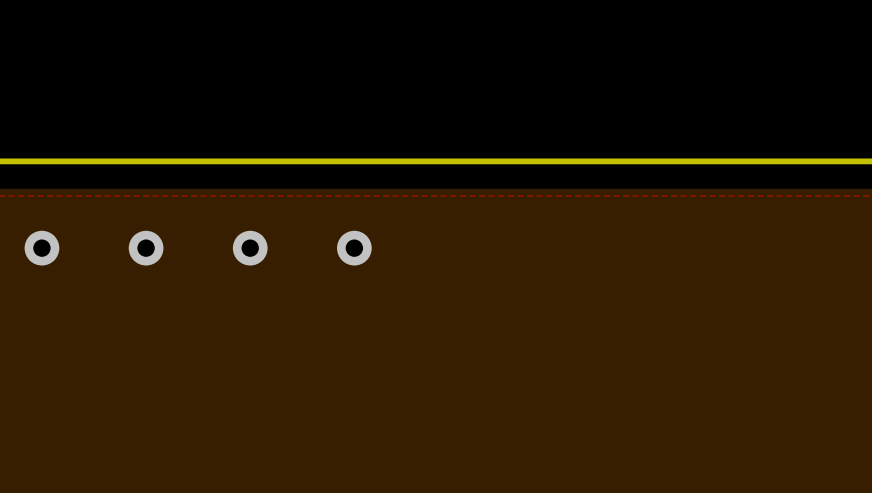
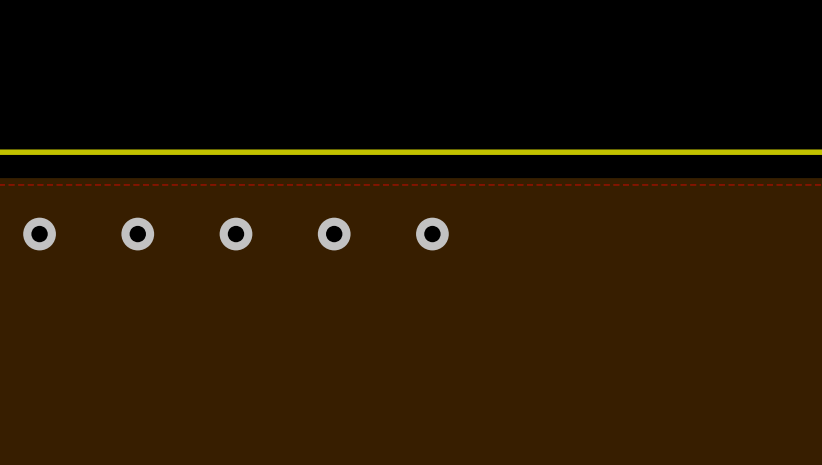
via: none -> (432, 234)

